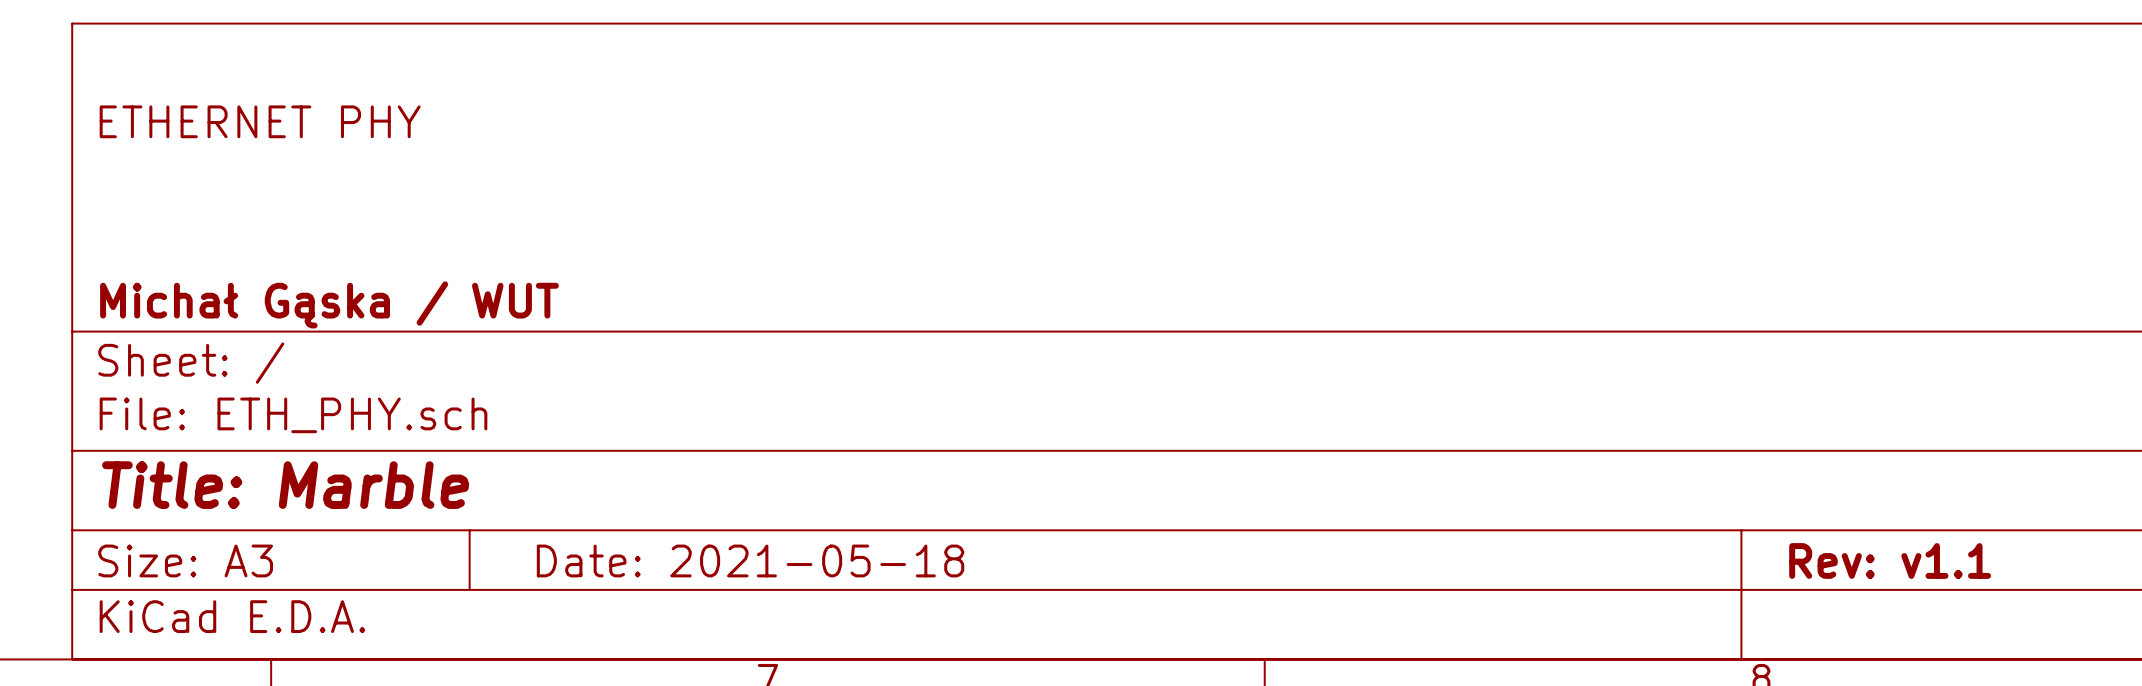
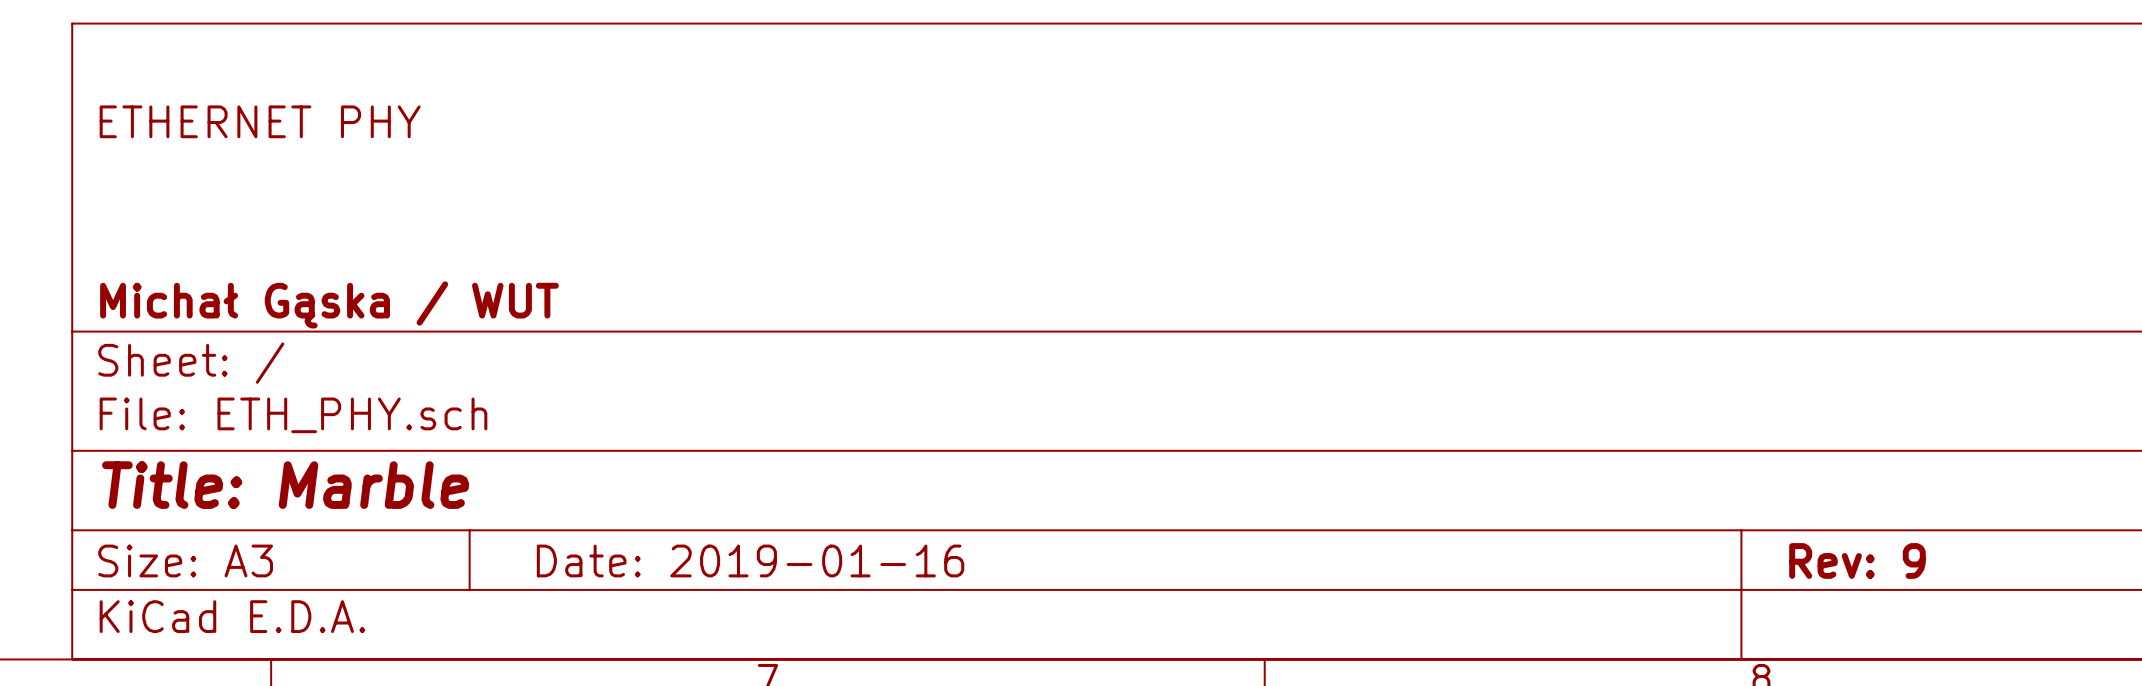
title block: Date: 2021-05-18 (750, 560) -> Date: 2019-01-16 (750, 560)
title block: Rev: v1.1 (1890, 560) -> Rev: 9 (1857, 560)

